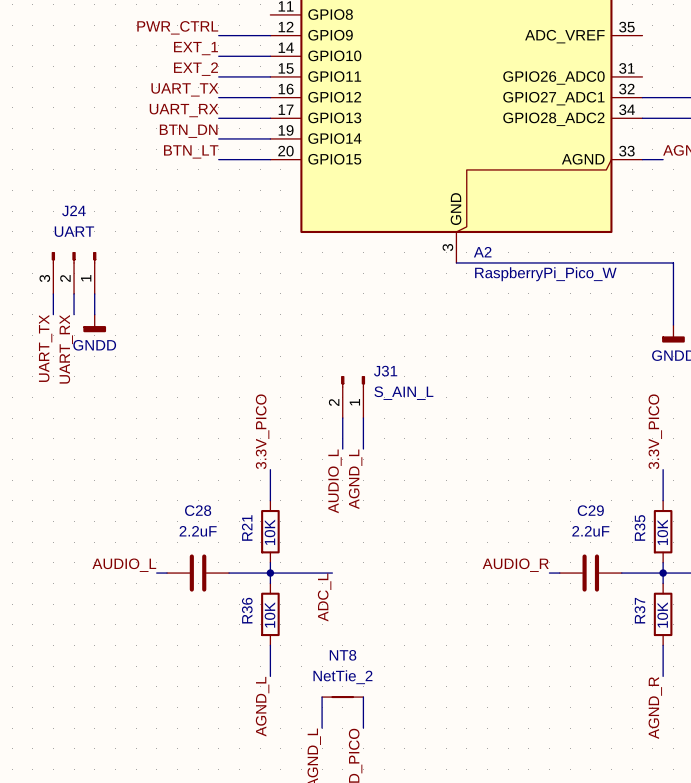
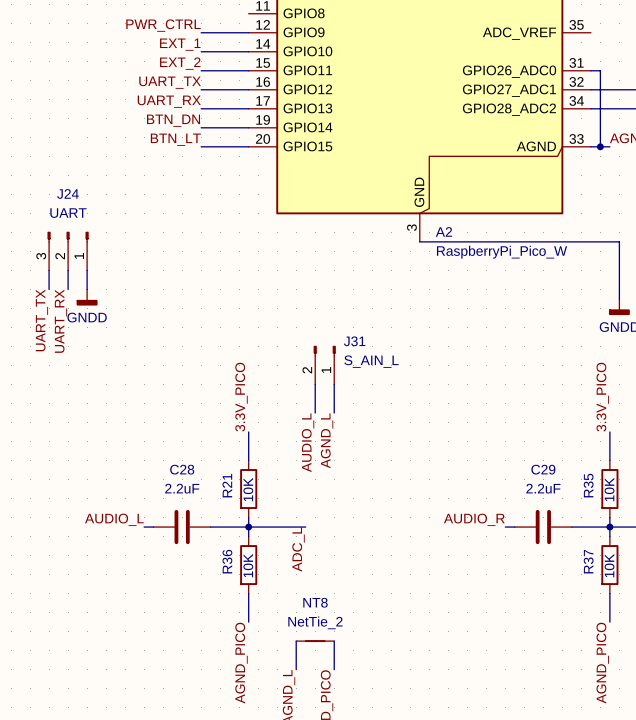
wire: none -> (590, 70) (600, 70) (600, 146)
junction: none -> (600, 146)
label: AGND_L (262, 706) -> AGND_PICO (241, 663)
label: AGND_R (655, 708) -> AGND_PICO (602, 663)

